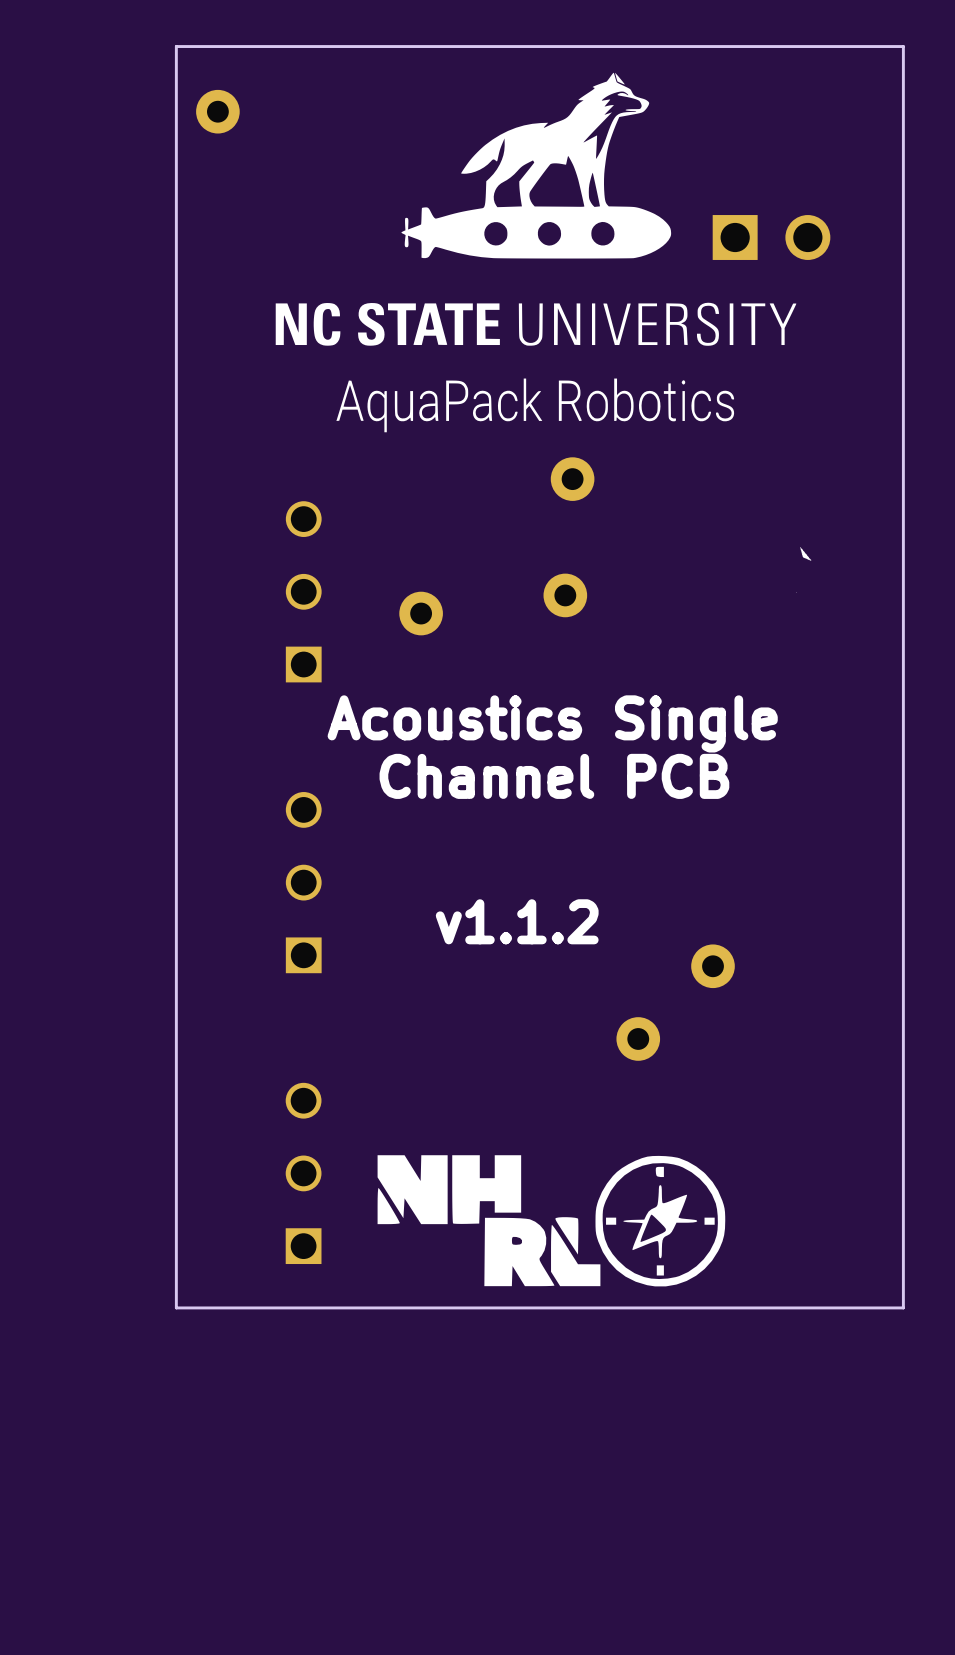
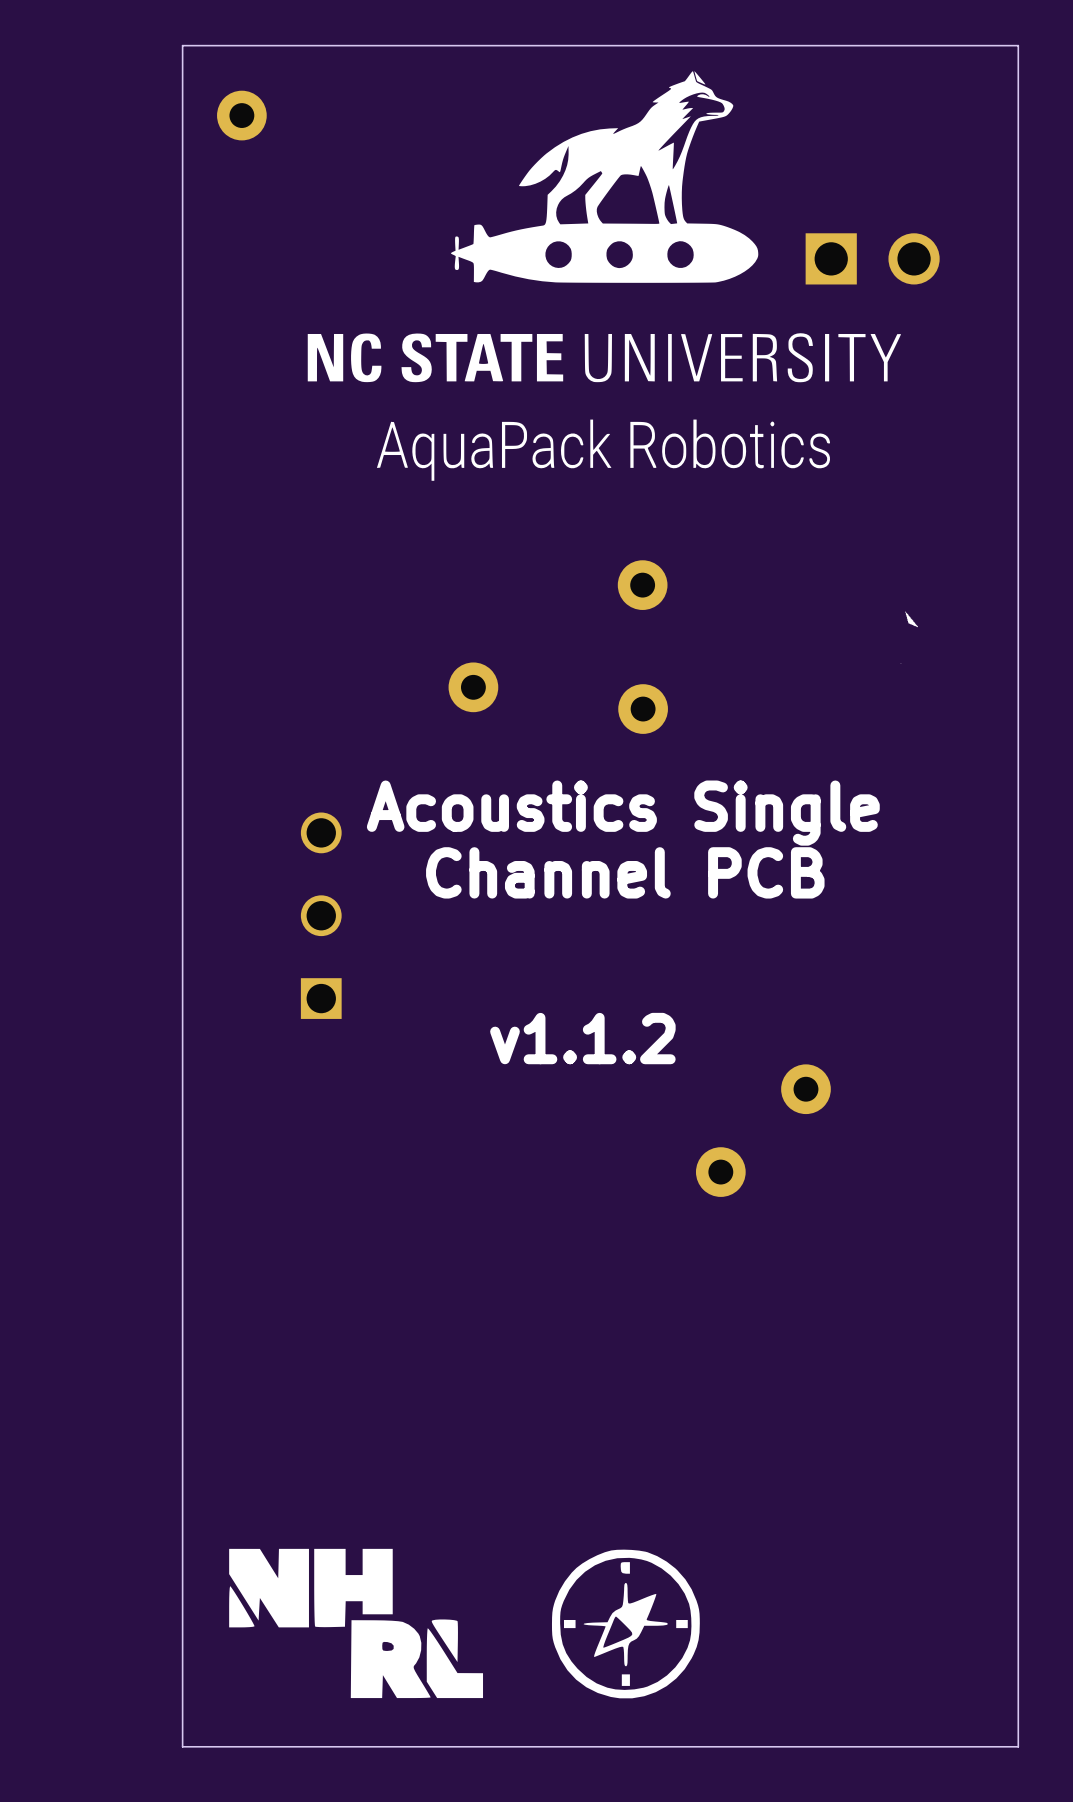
board edge: (903, 46) (176, 46) (176, 1307) (903, 1307) (903, 46) -> (1018, 45) (1018, 1746) (182, 1746) (182, 45) (1018, 45)
part: (572, 479) -> none
part: none -> (642, 585)
part: (303, 591) -> none
part: (565, 595) -> none
part: none -> (643, 709)
part position: (303, 882) -> (321, 915)
part: (303, 1173) -> none
drawing position: (488, 1220) -> (356, 1623)
drawing position: (660, 1221) -> (625, 1623)

